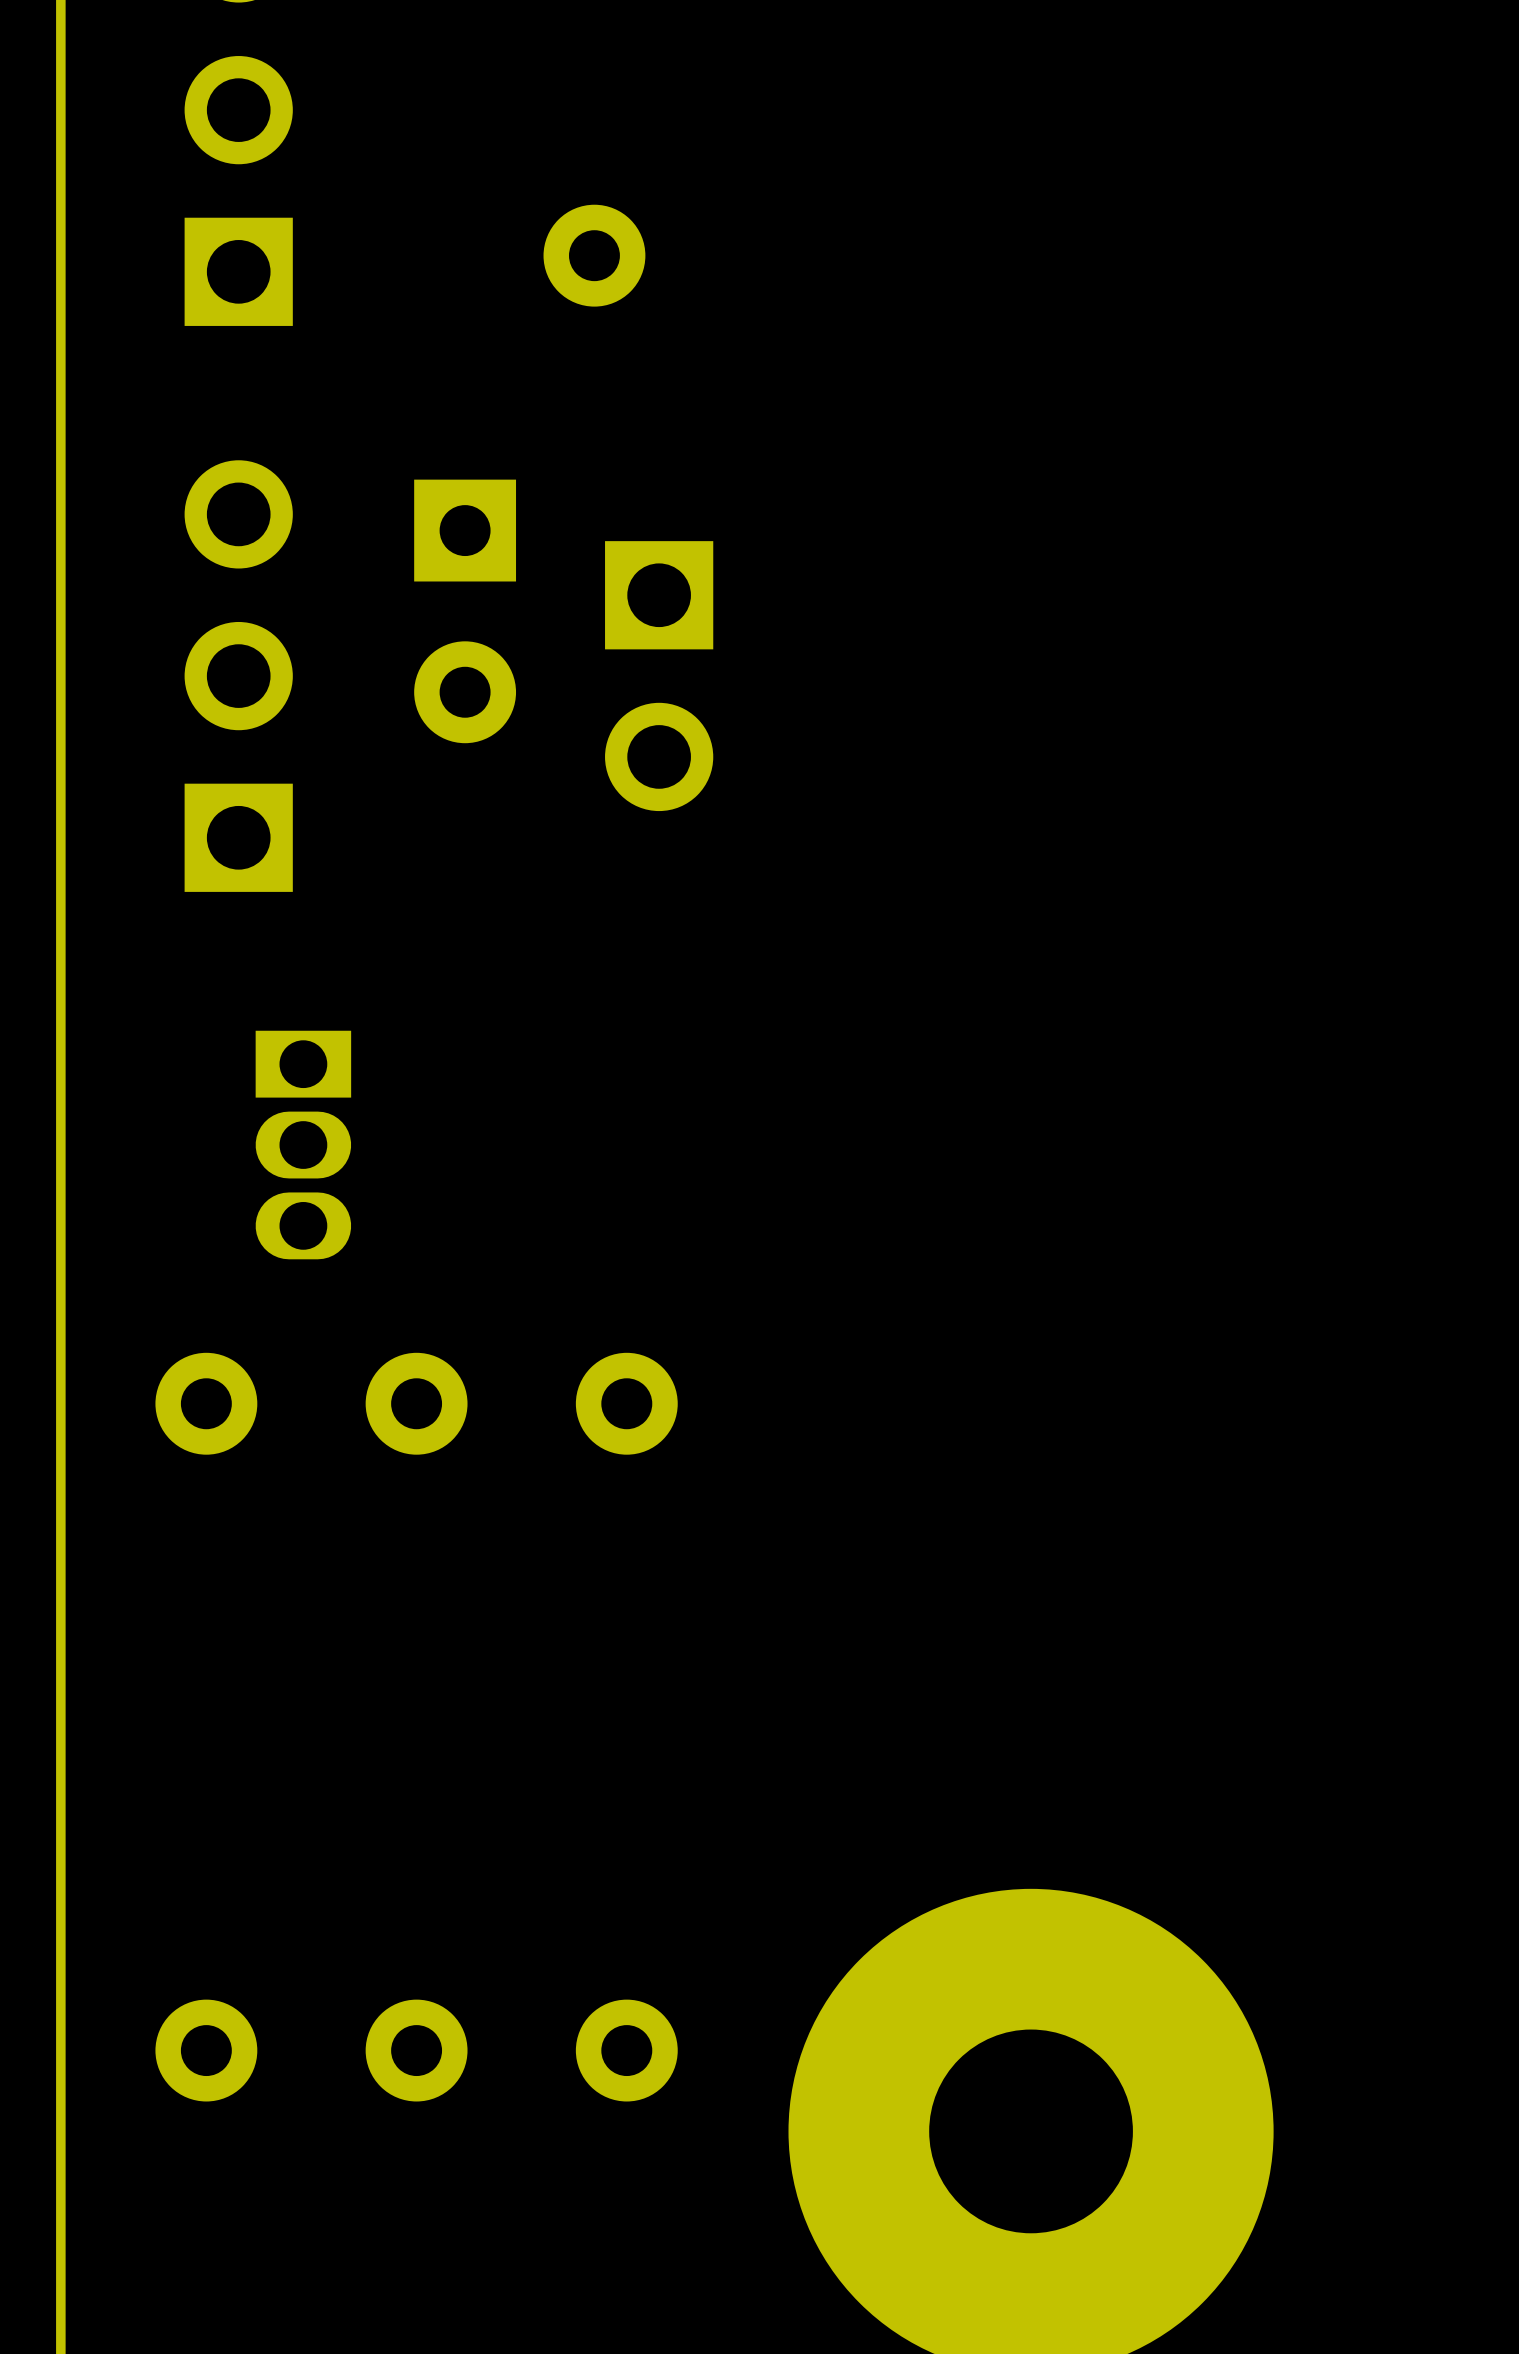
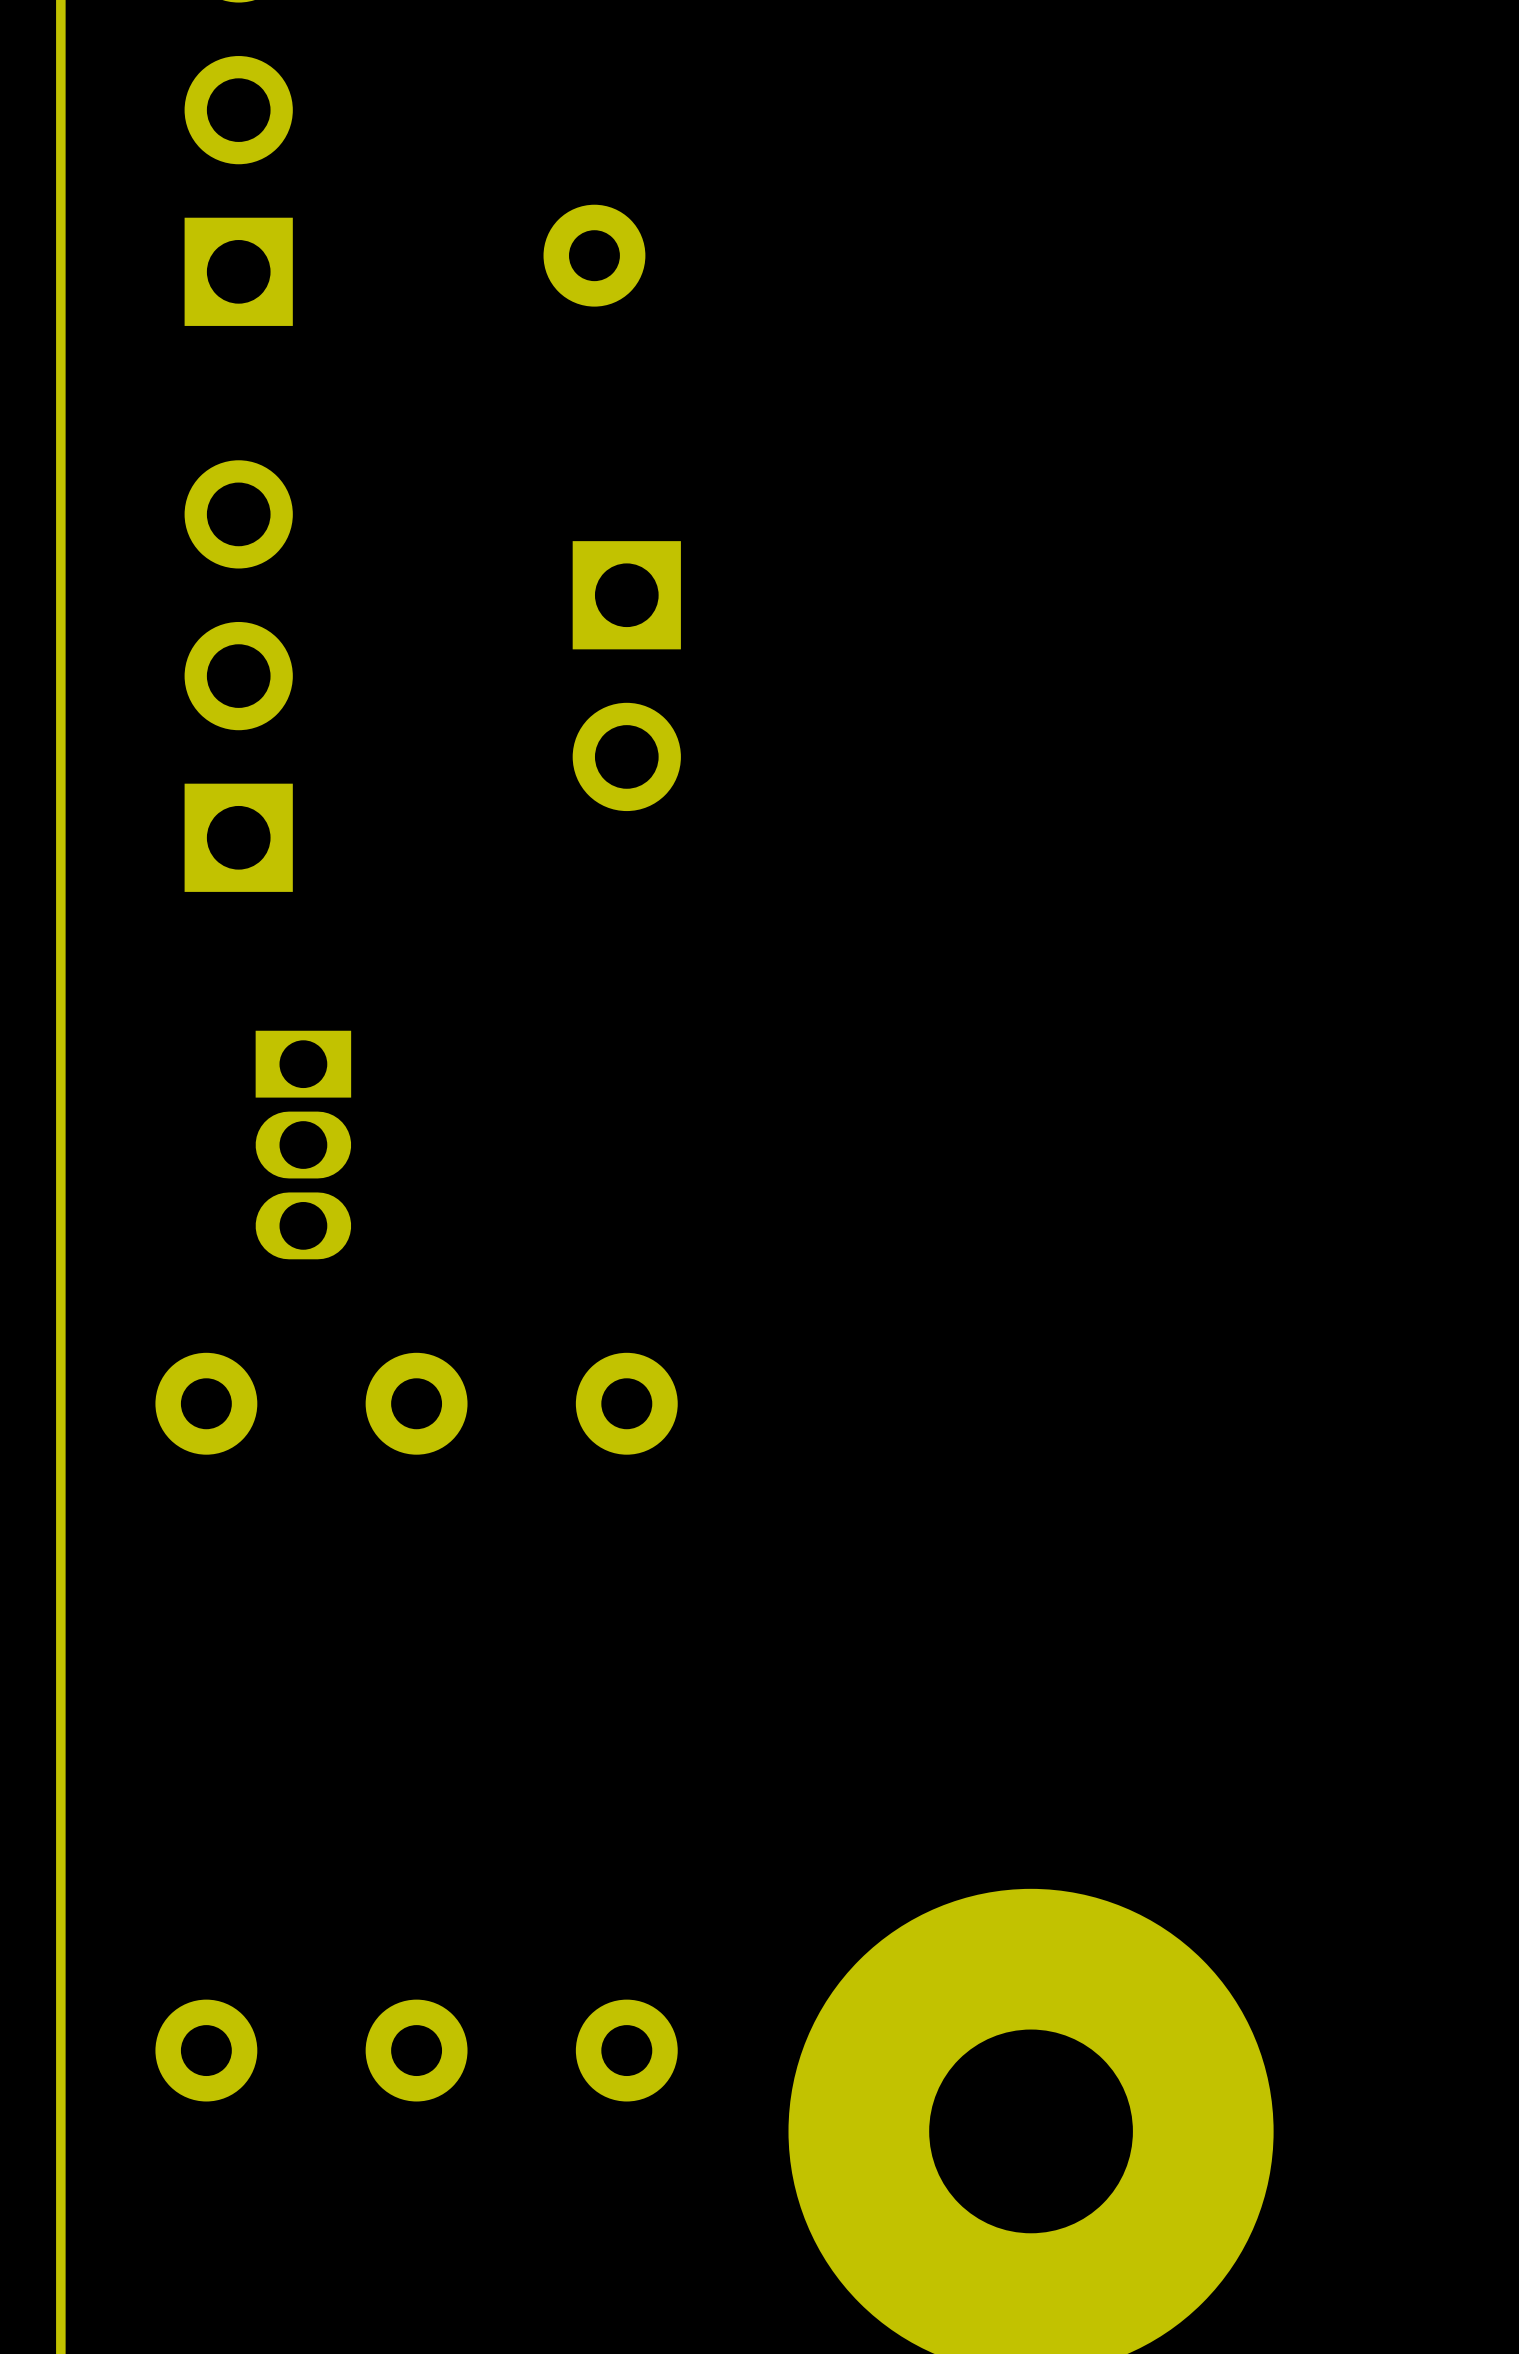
part: (465, 611) -> none
part position: (659, 676) -> (626, 676)

